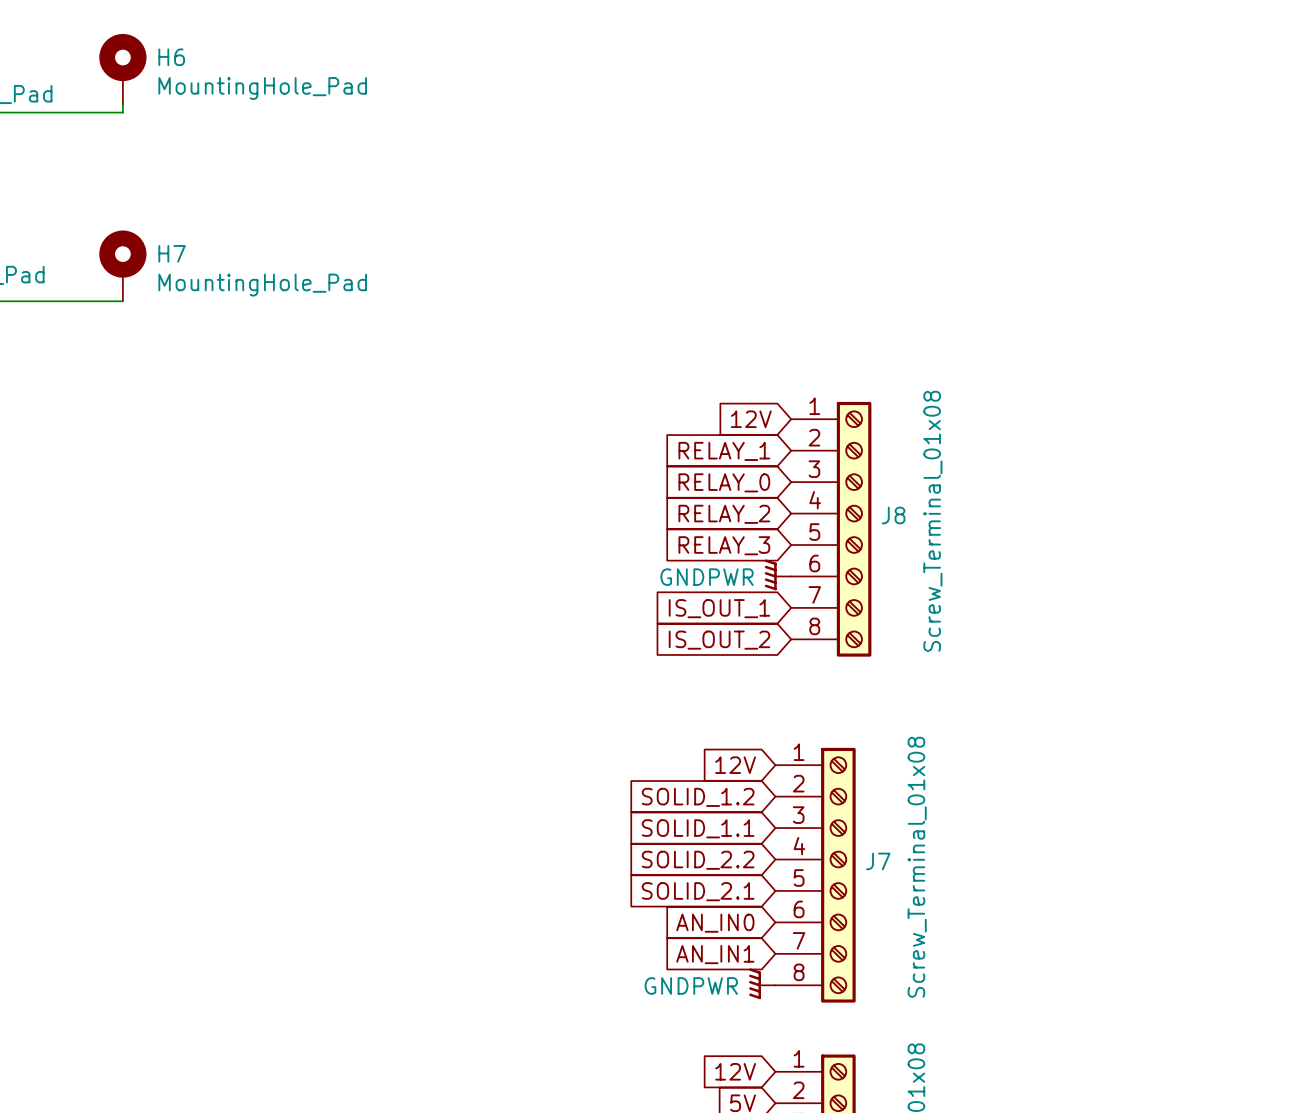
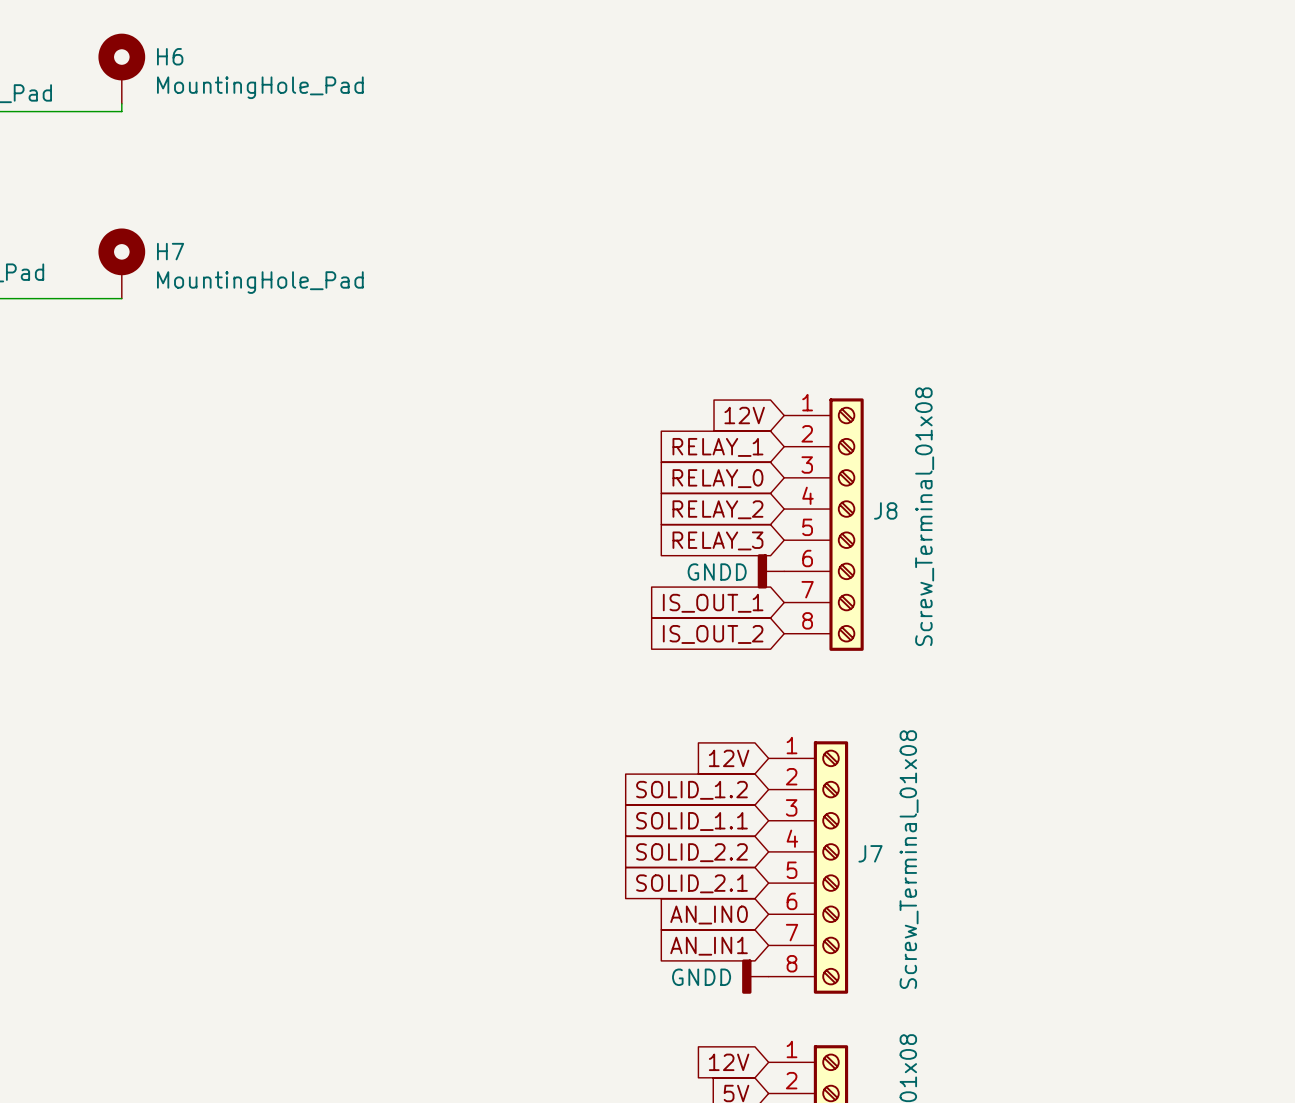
power symbol: GNDPWR (778, 574) -> GNDD (770, 571)
power symbol: GNDPWR (762, 983) -> GNDD (755, 976)

